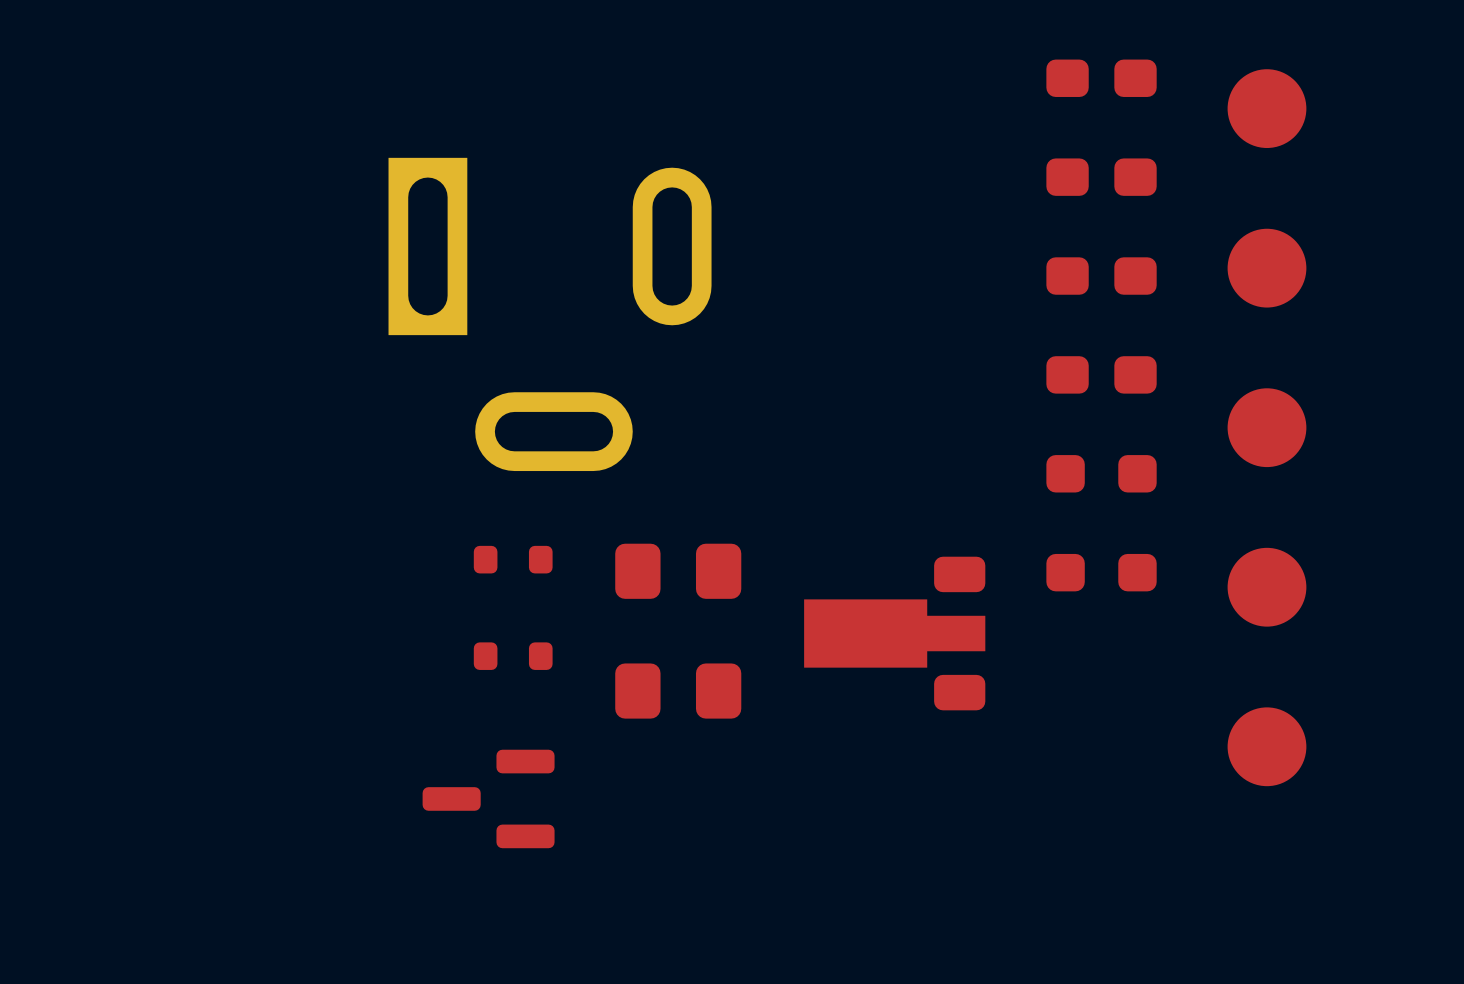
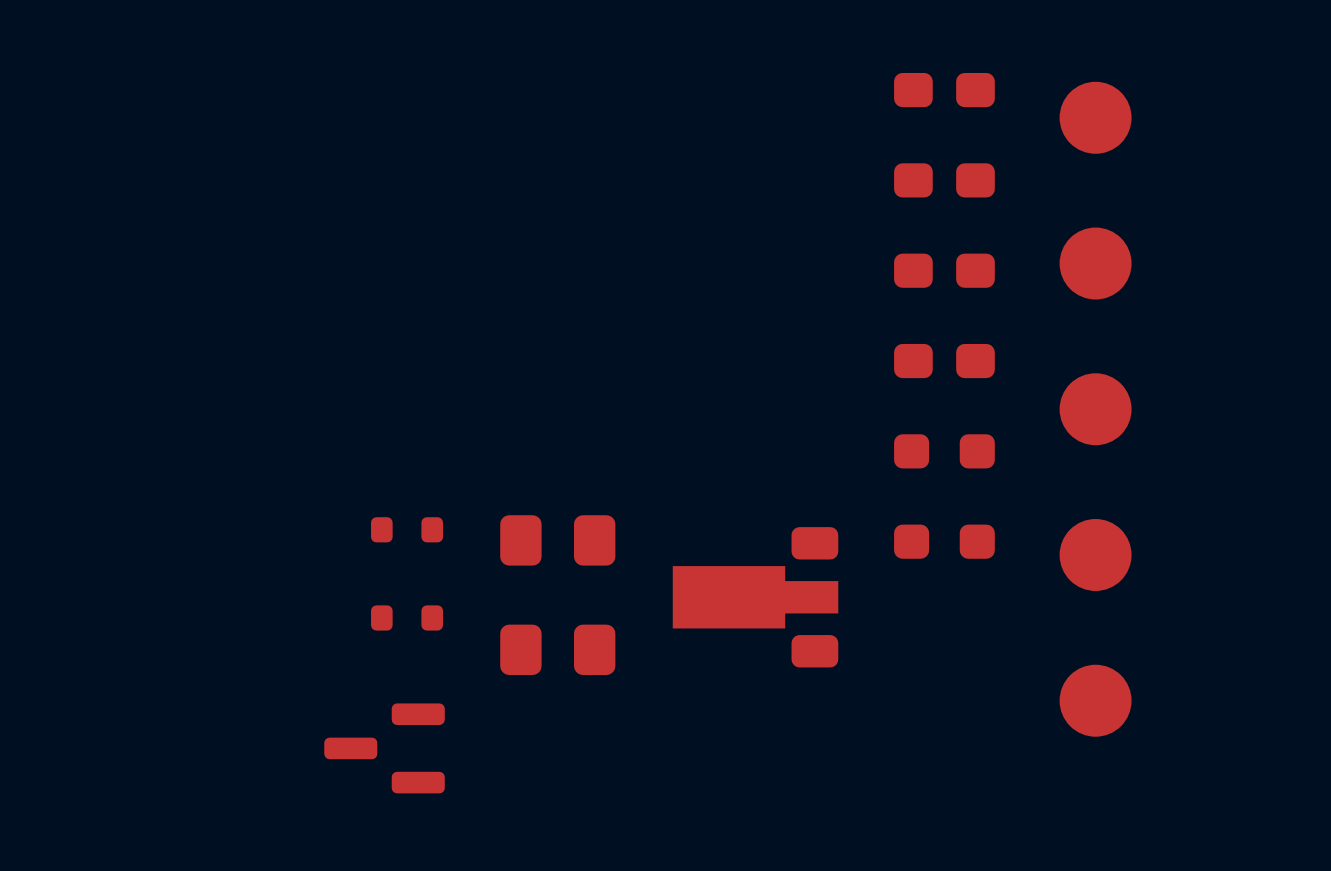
part: (550, 314) -> none

